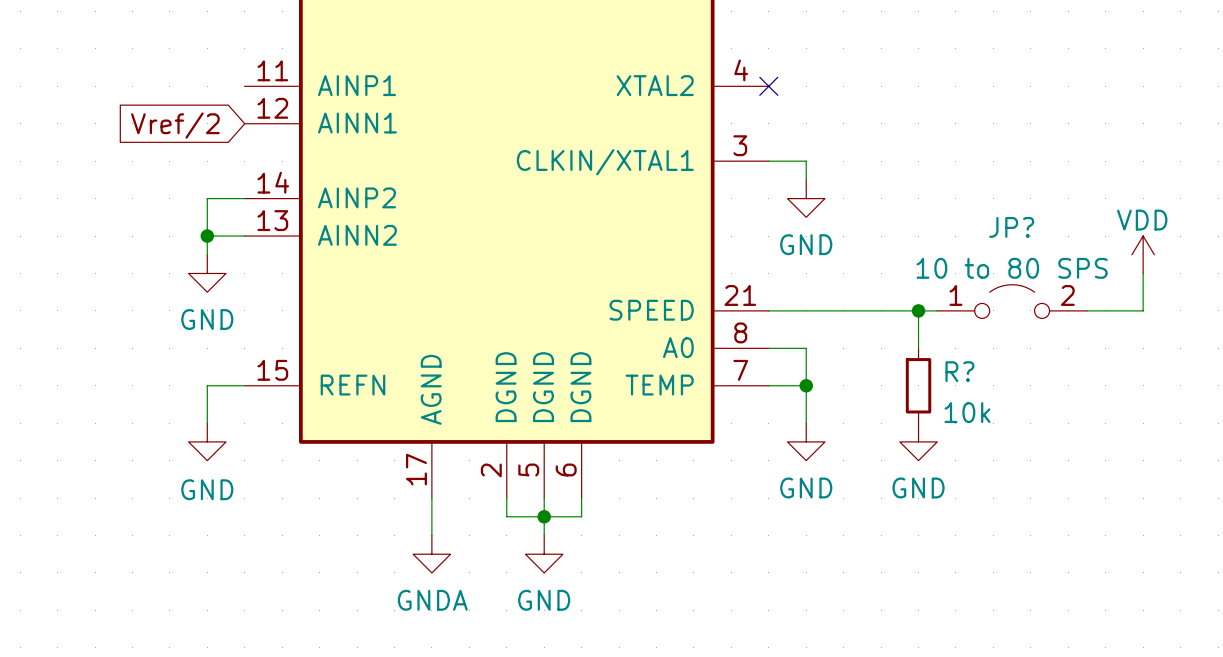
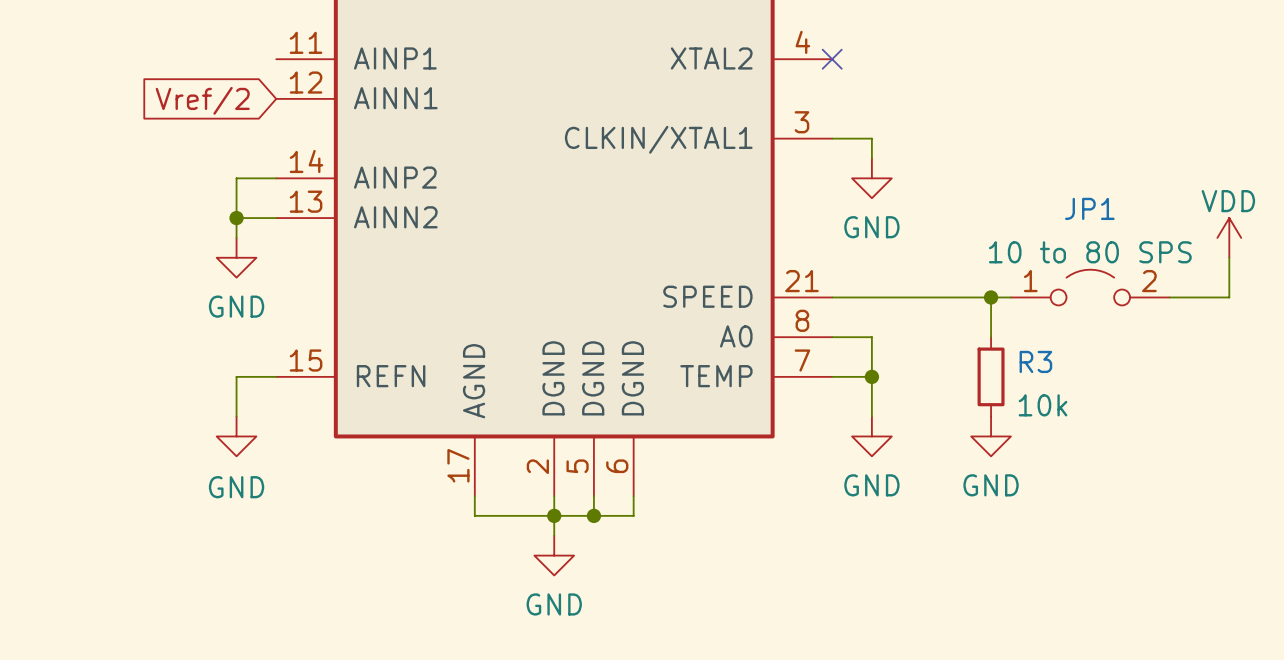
JP? name: JP? (1011, 227) -> JP1 (1089, 208)
R? name: R? (959, 371) -> R3 (1035, 361)
wire: (431, 516) (431, 535) -> (474, 515) (554, 515) (554, 535)
junction: none -> (554, 515)
wire: (544, 516) (544, 535) -> none
power symbol: GNDA (431, 554) -> none
power symbol position: GND (544, 554) -> GND (554, 555)

